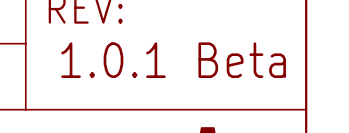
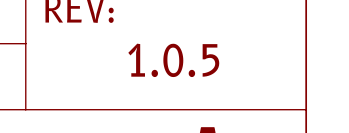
text: 1.0.1 Beta (173, 60) -> 1.0.5 (173, 60)

